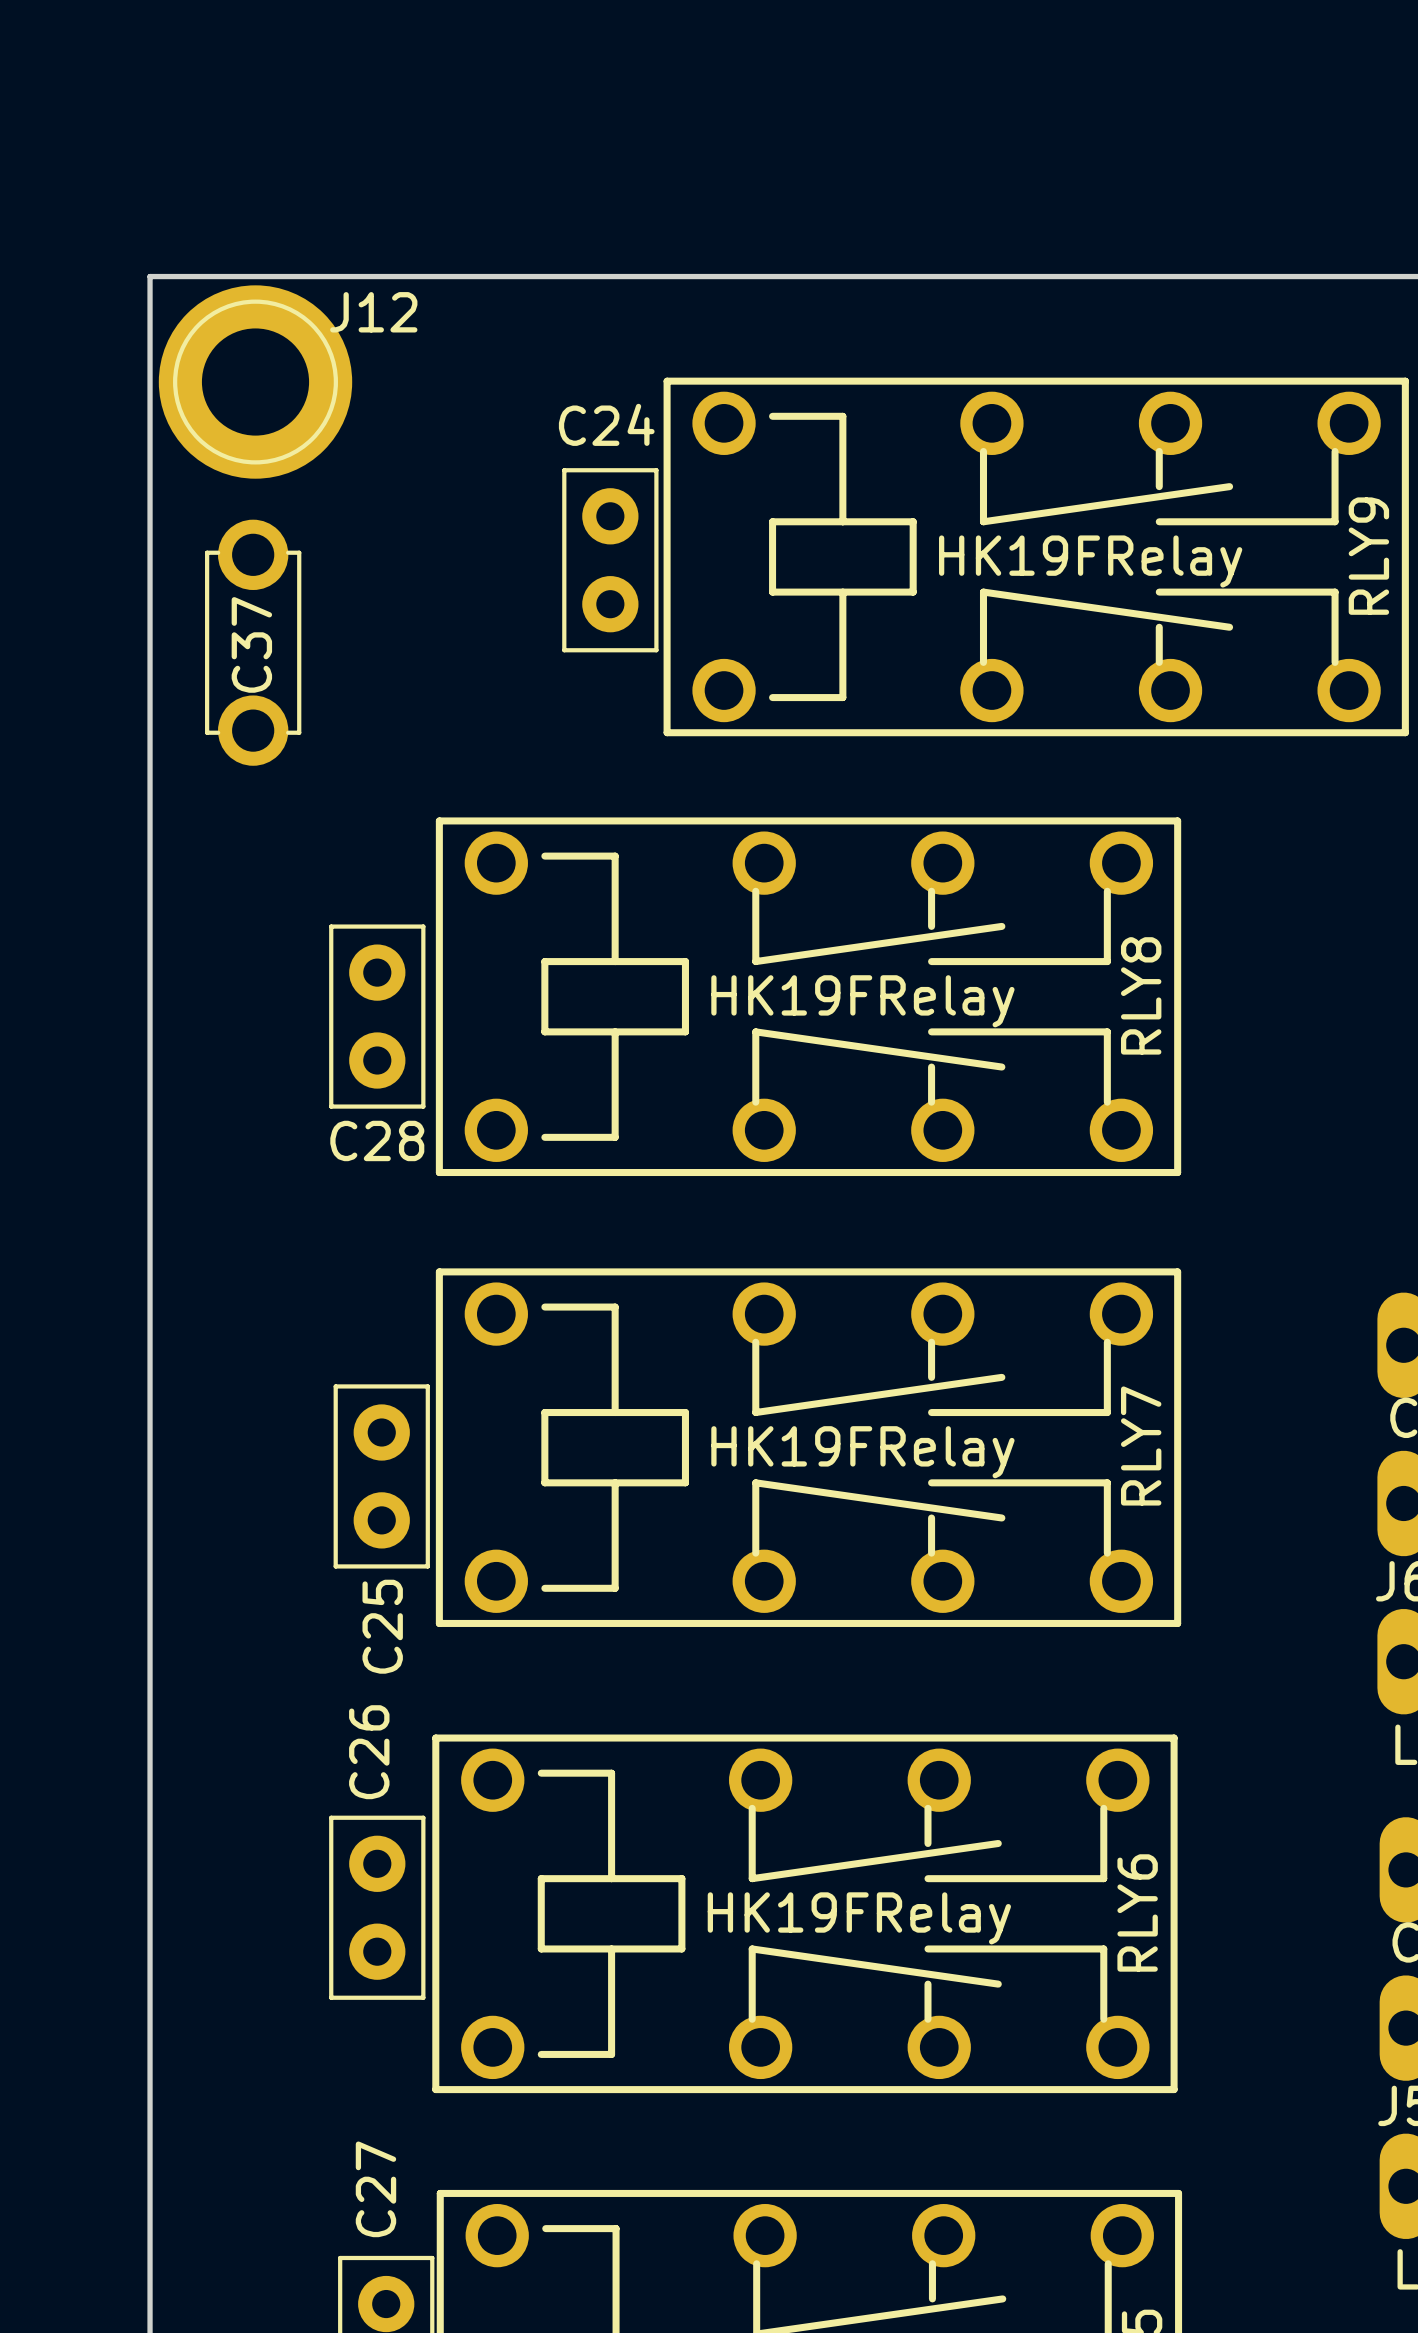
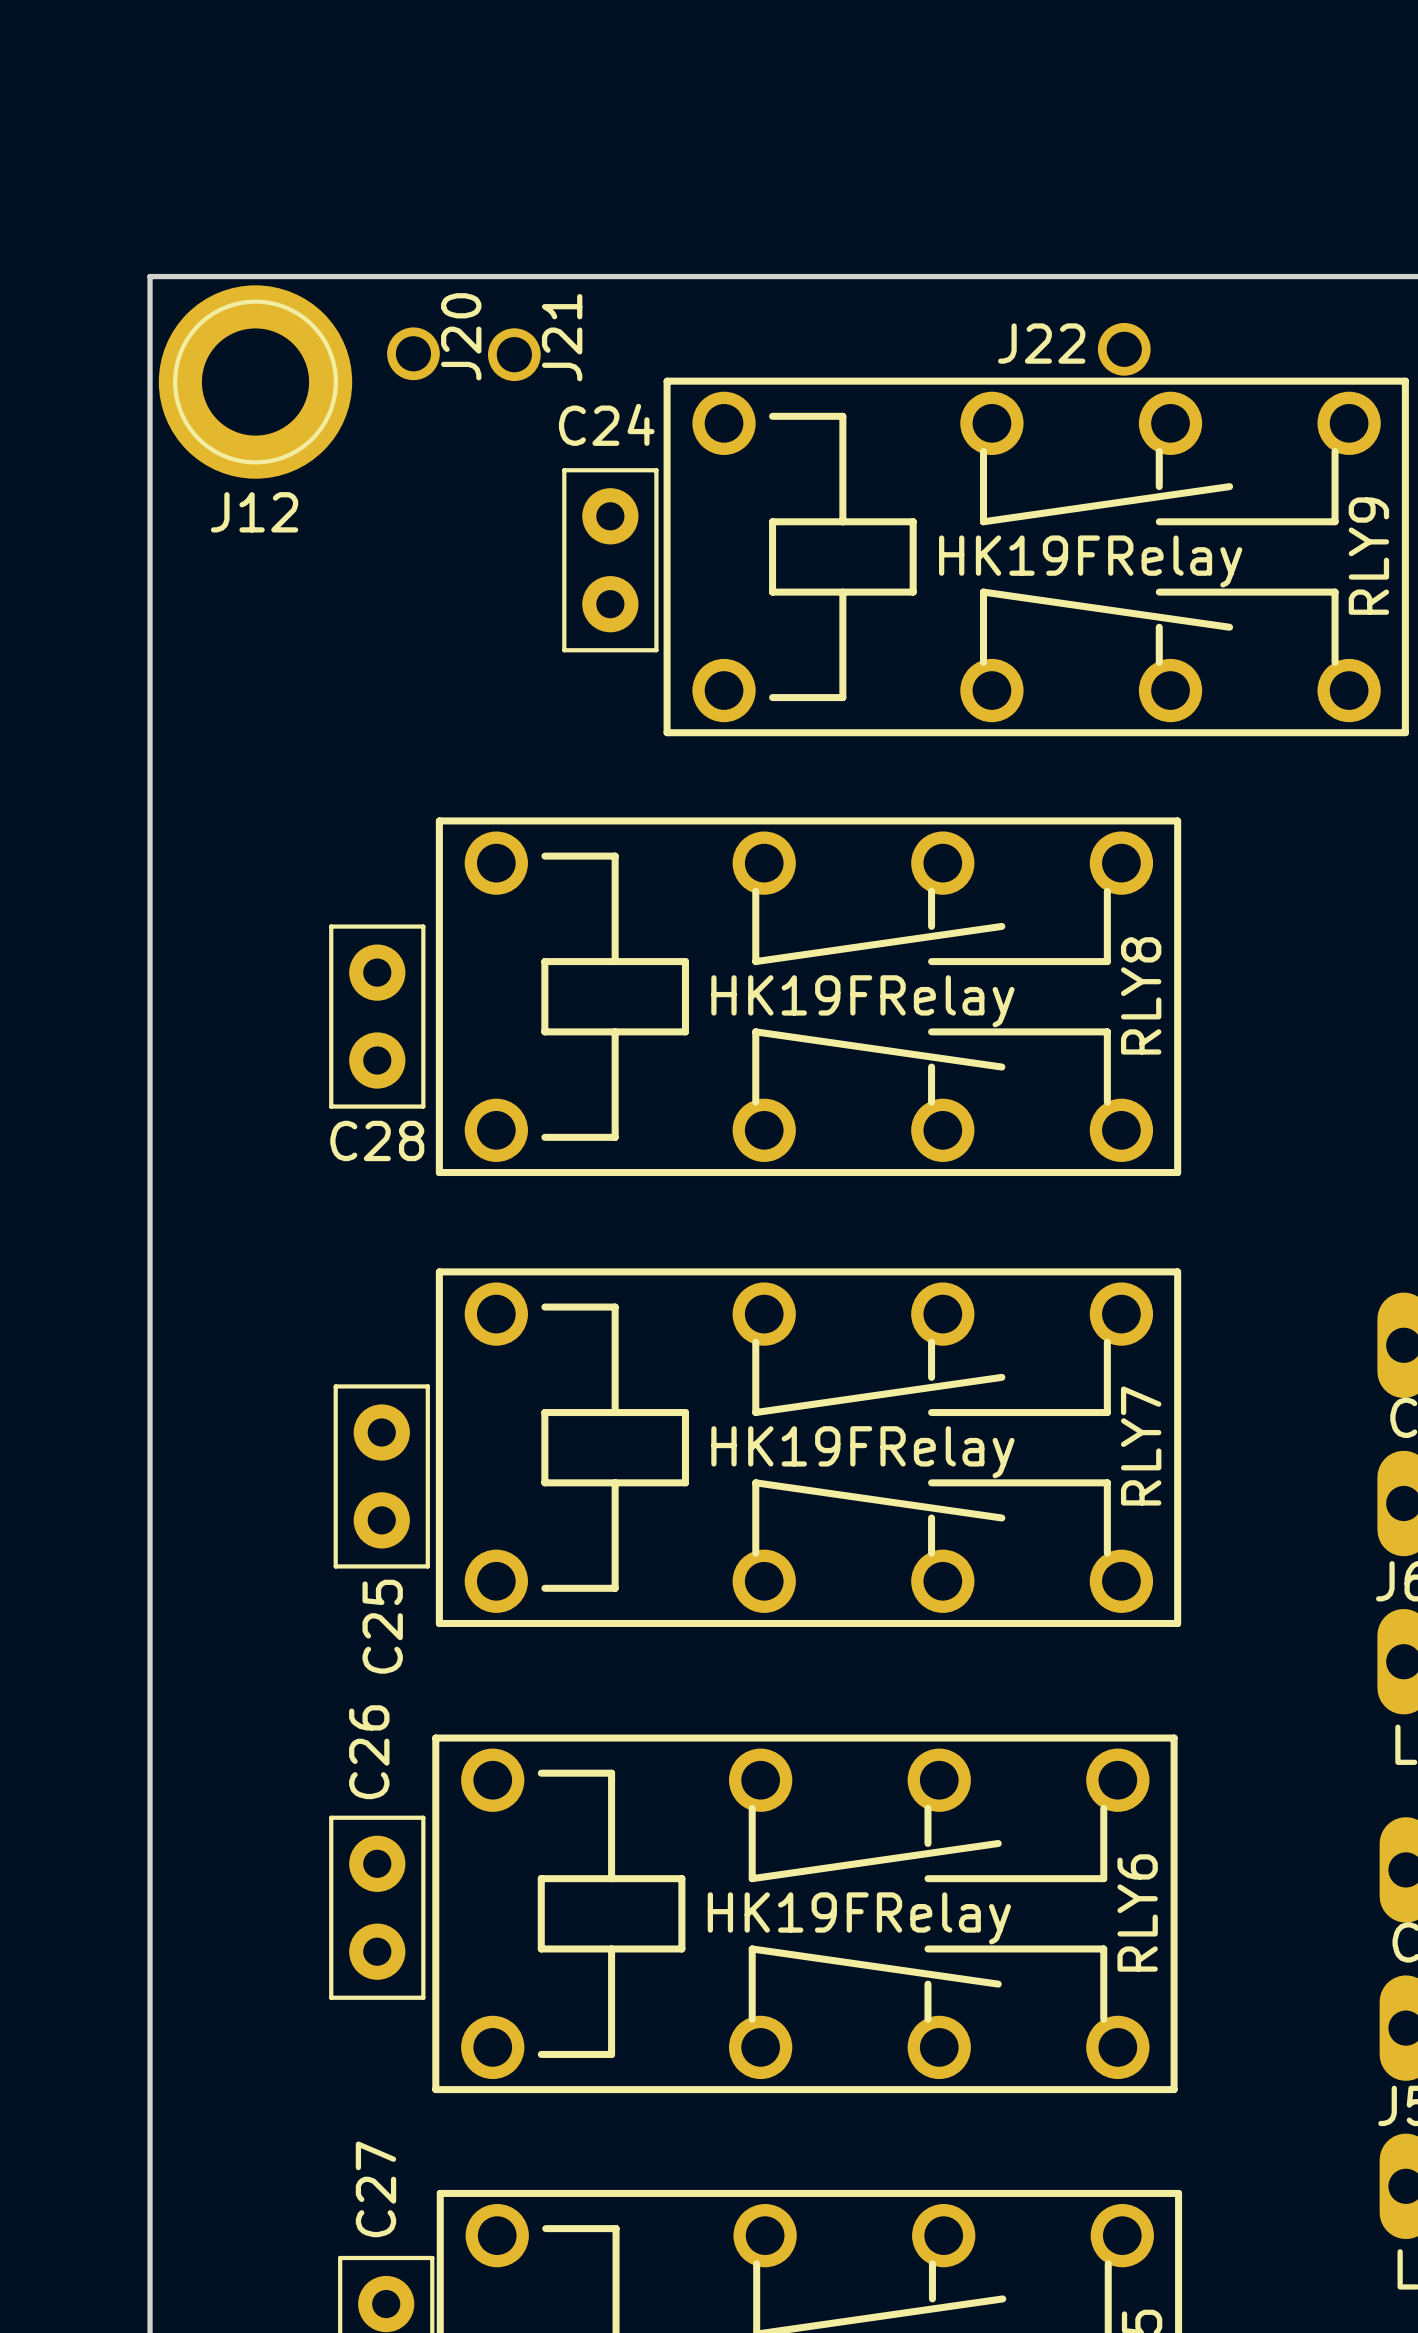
J12 name position: J12 (373, 312) -> J12 (254, 512)
J22: none -> (1124, 349)
J20: none -> (413, 353)
J21: none -> (514, 354)
C37: (253, 642) -> none

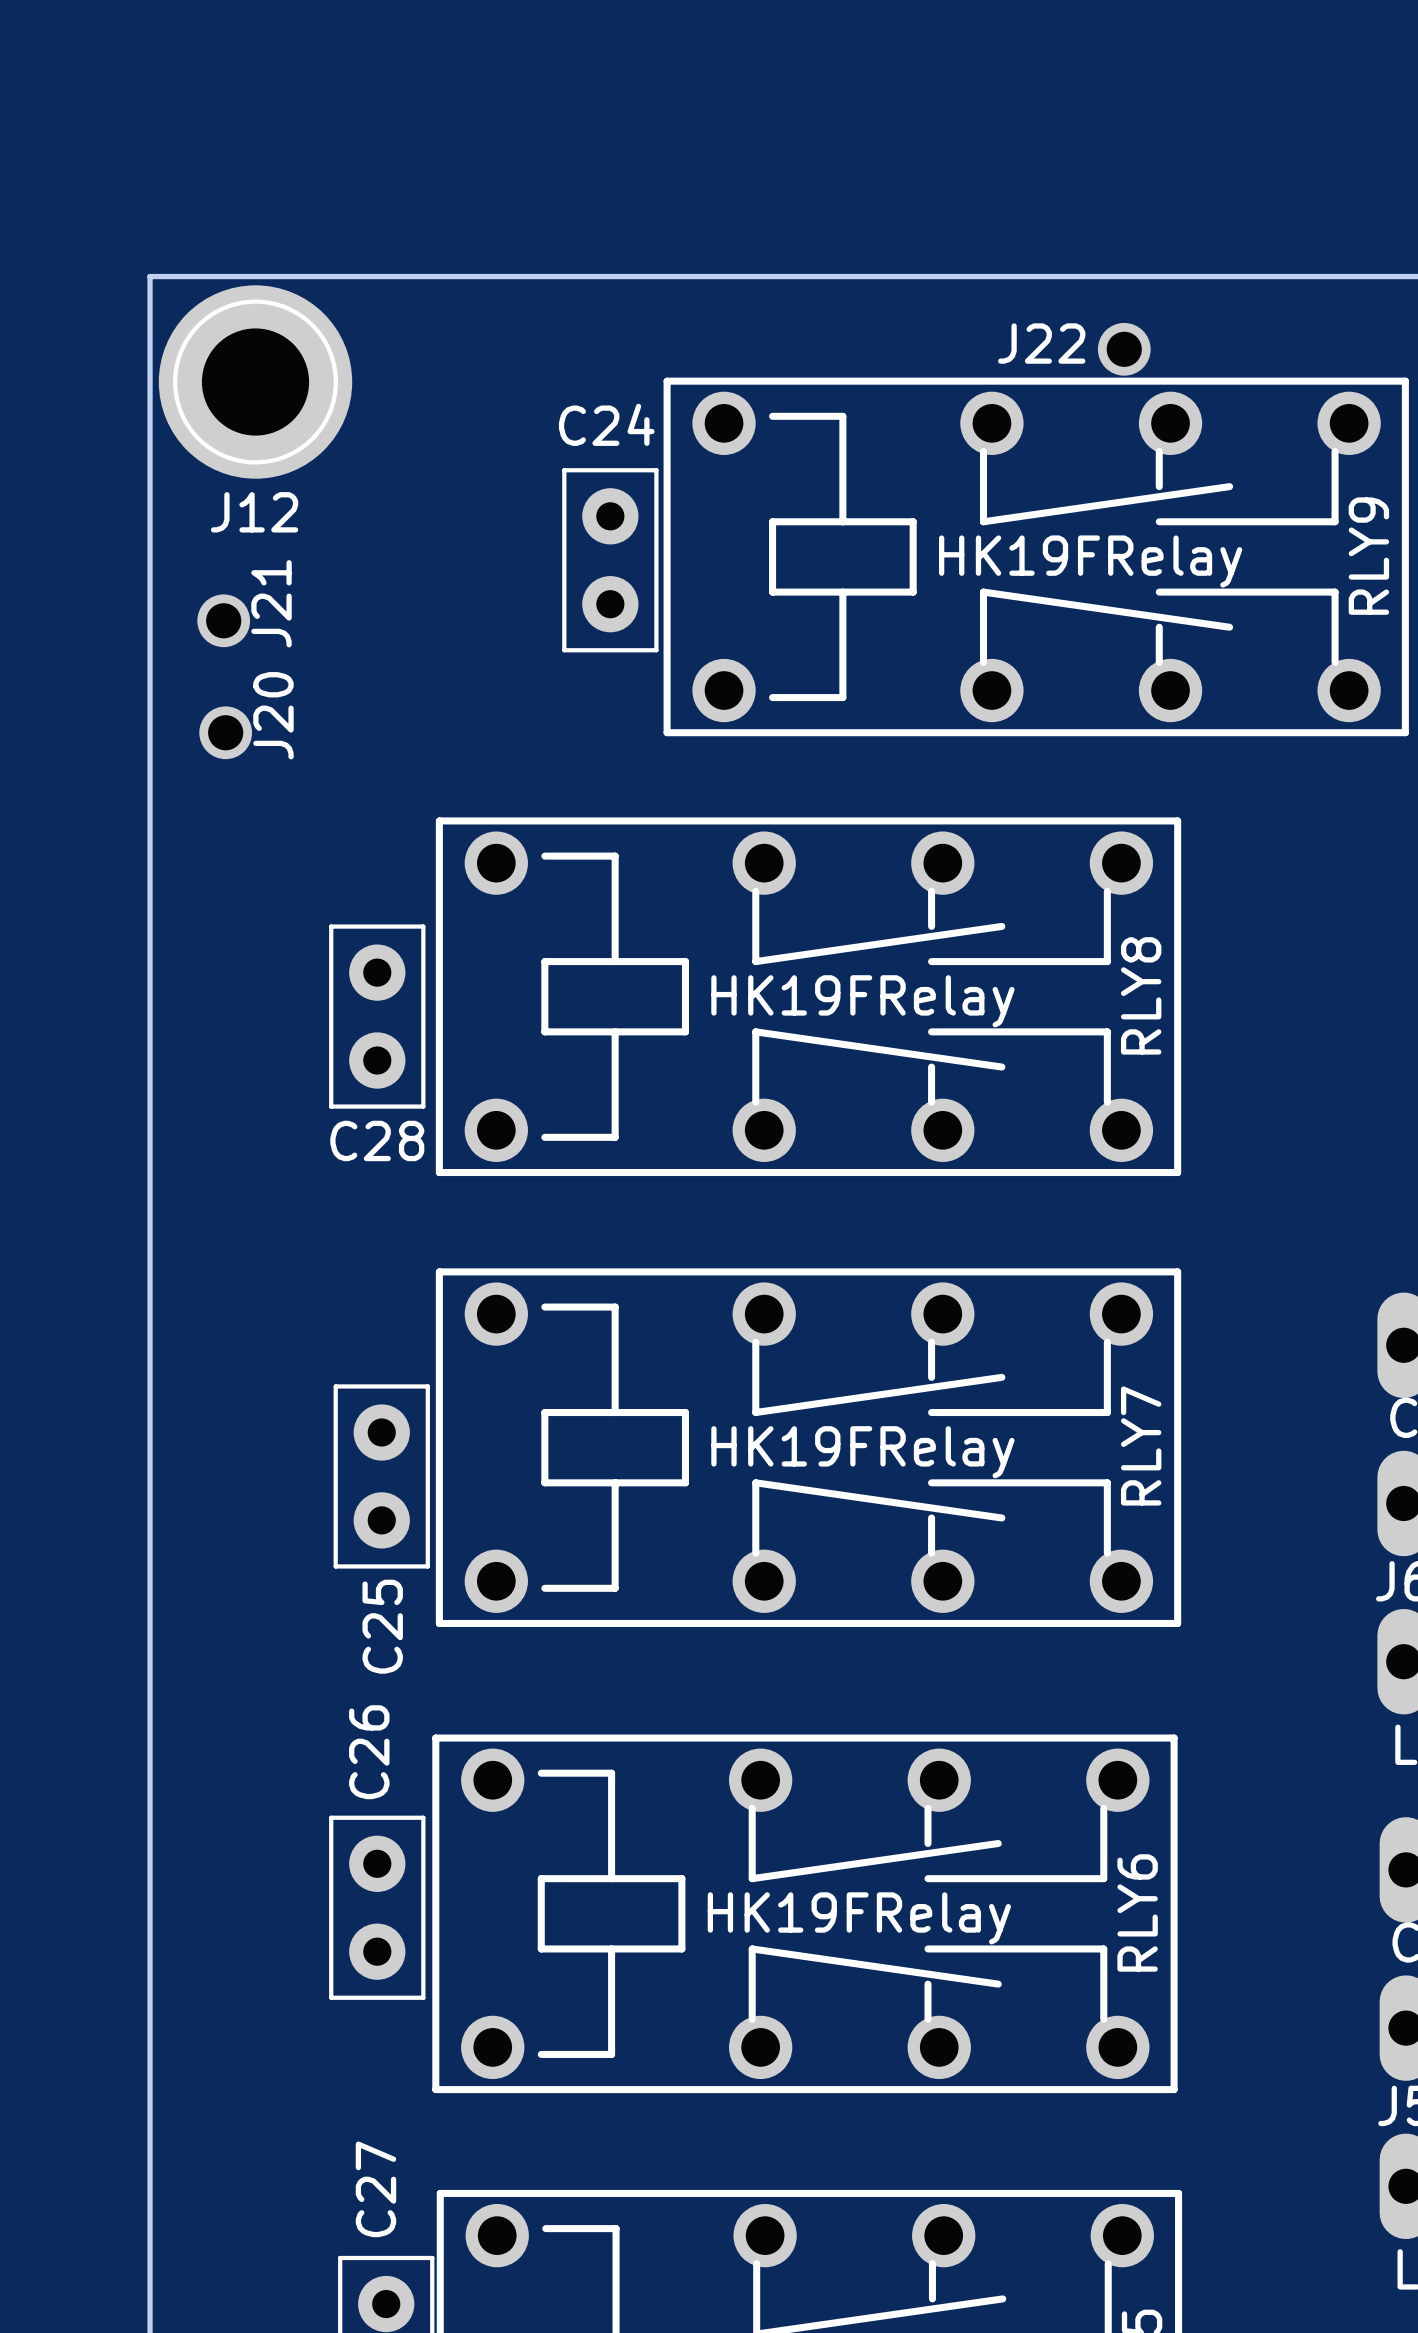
J20 position: (413, 353) -> (225, 732)
J21 position: (514, 354) -> (223, 620)

